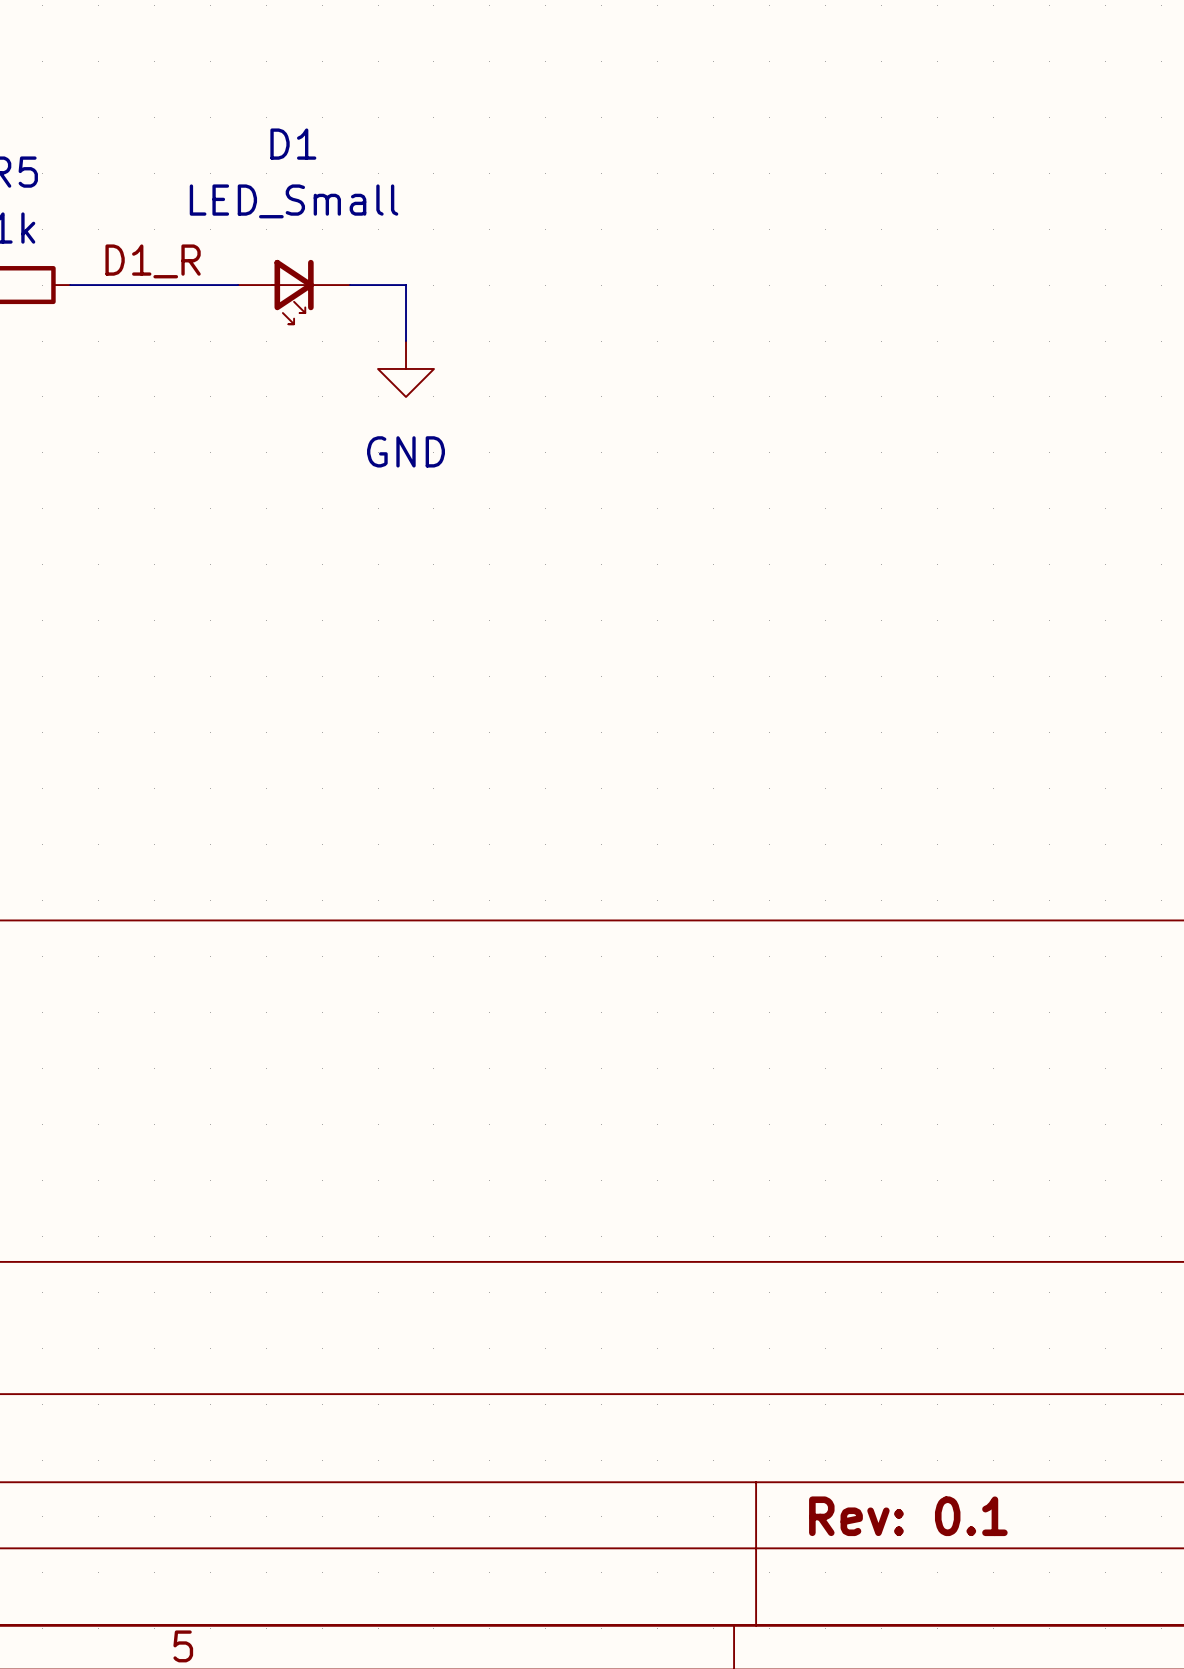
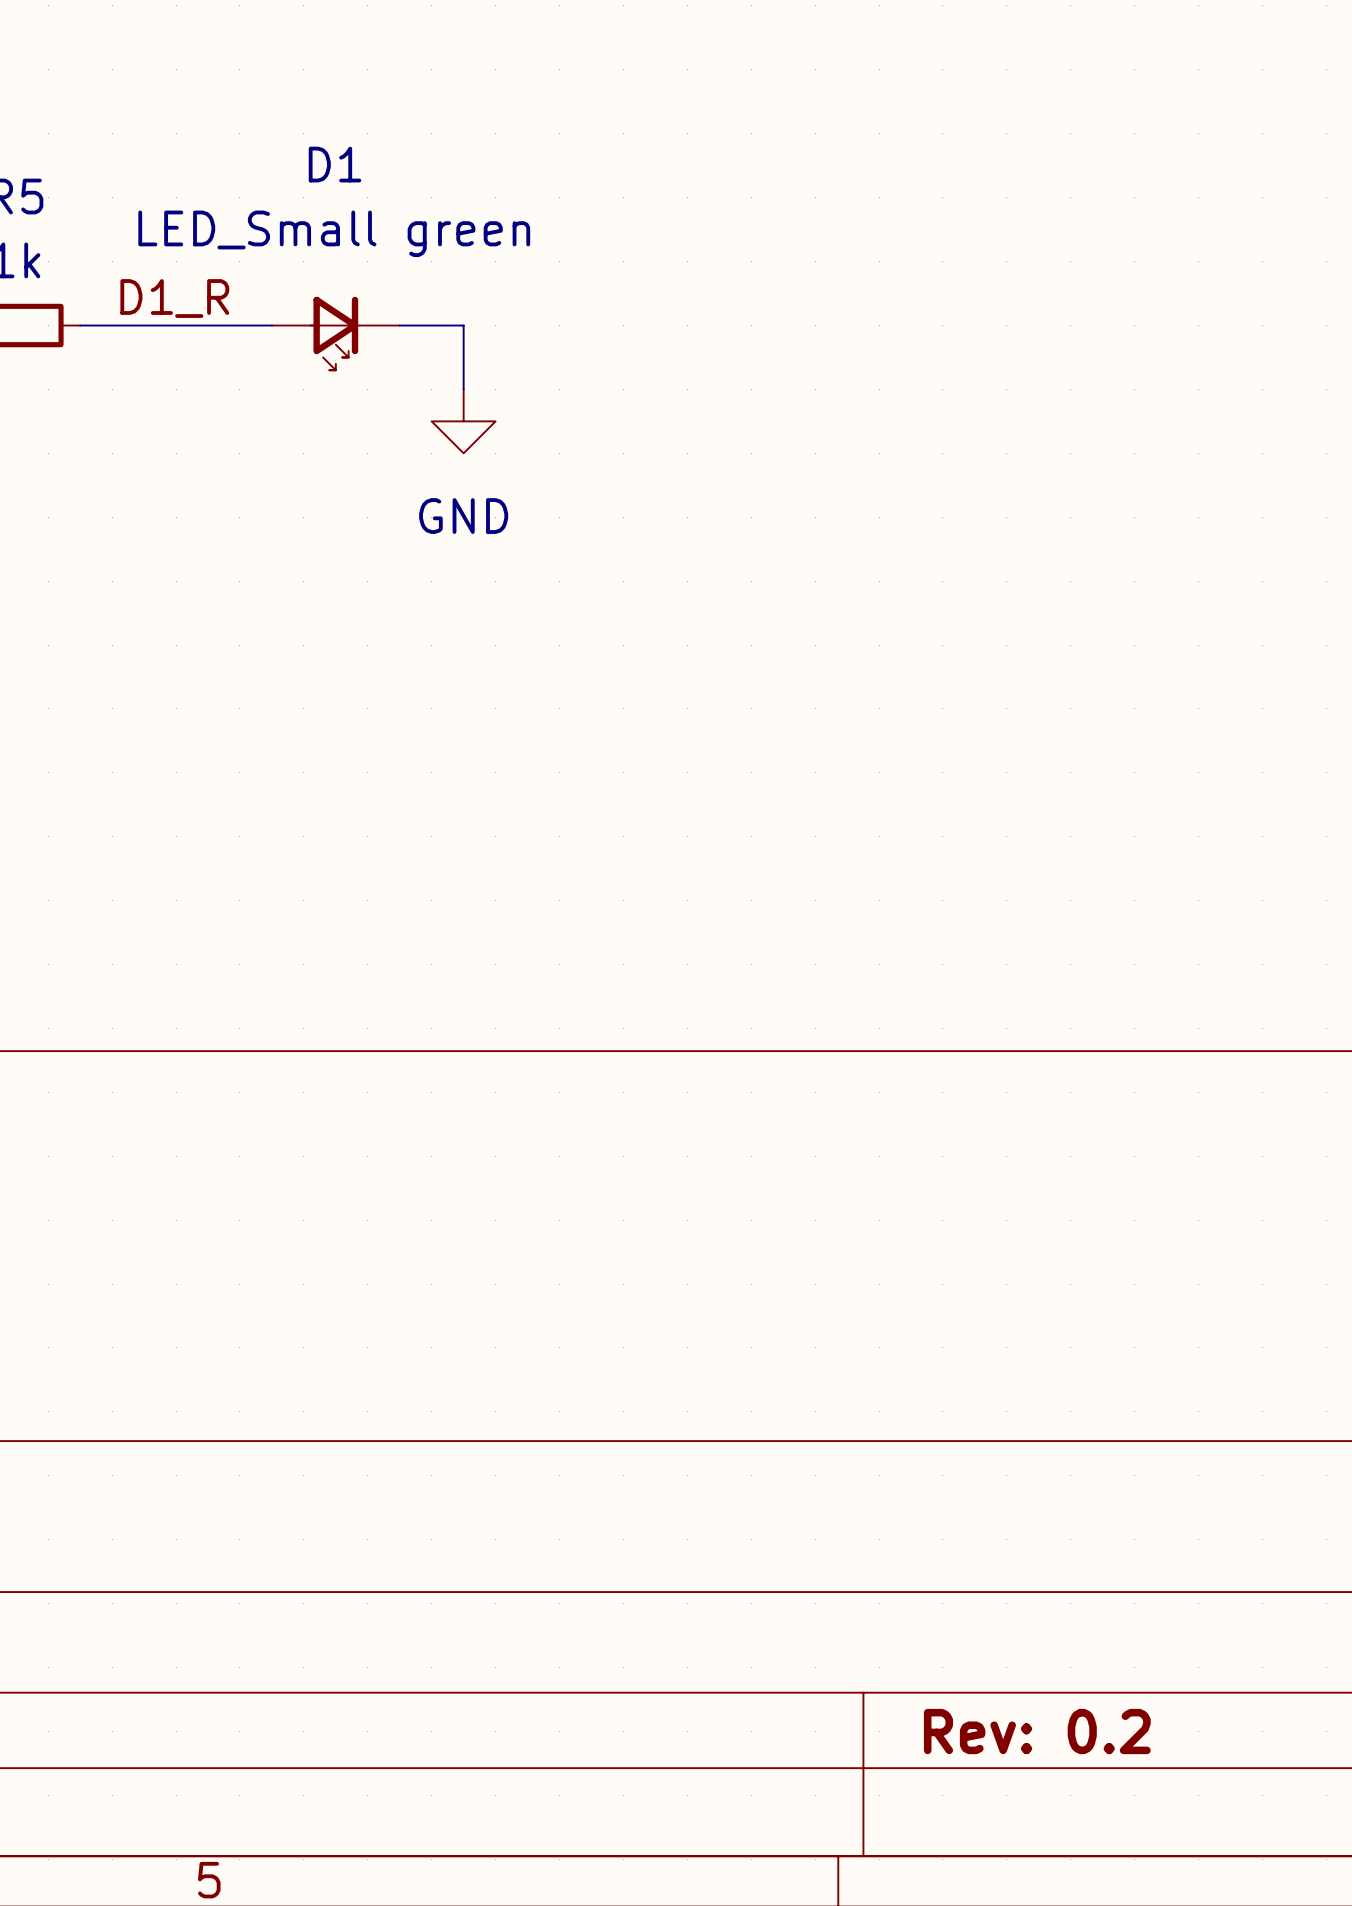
D1 value: LED_Small (294, 201) -> LED_Small green (334, 233)
title block: Rev: 0.1 (908, 1516) -> Rev: 0.2 (1037, 1731)

